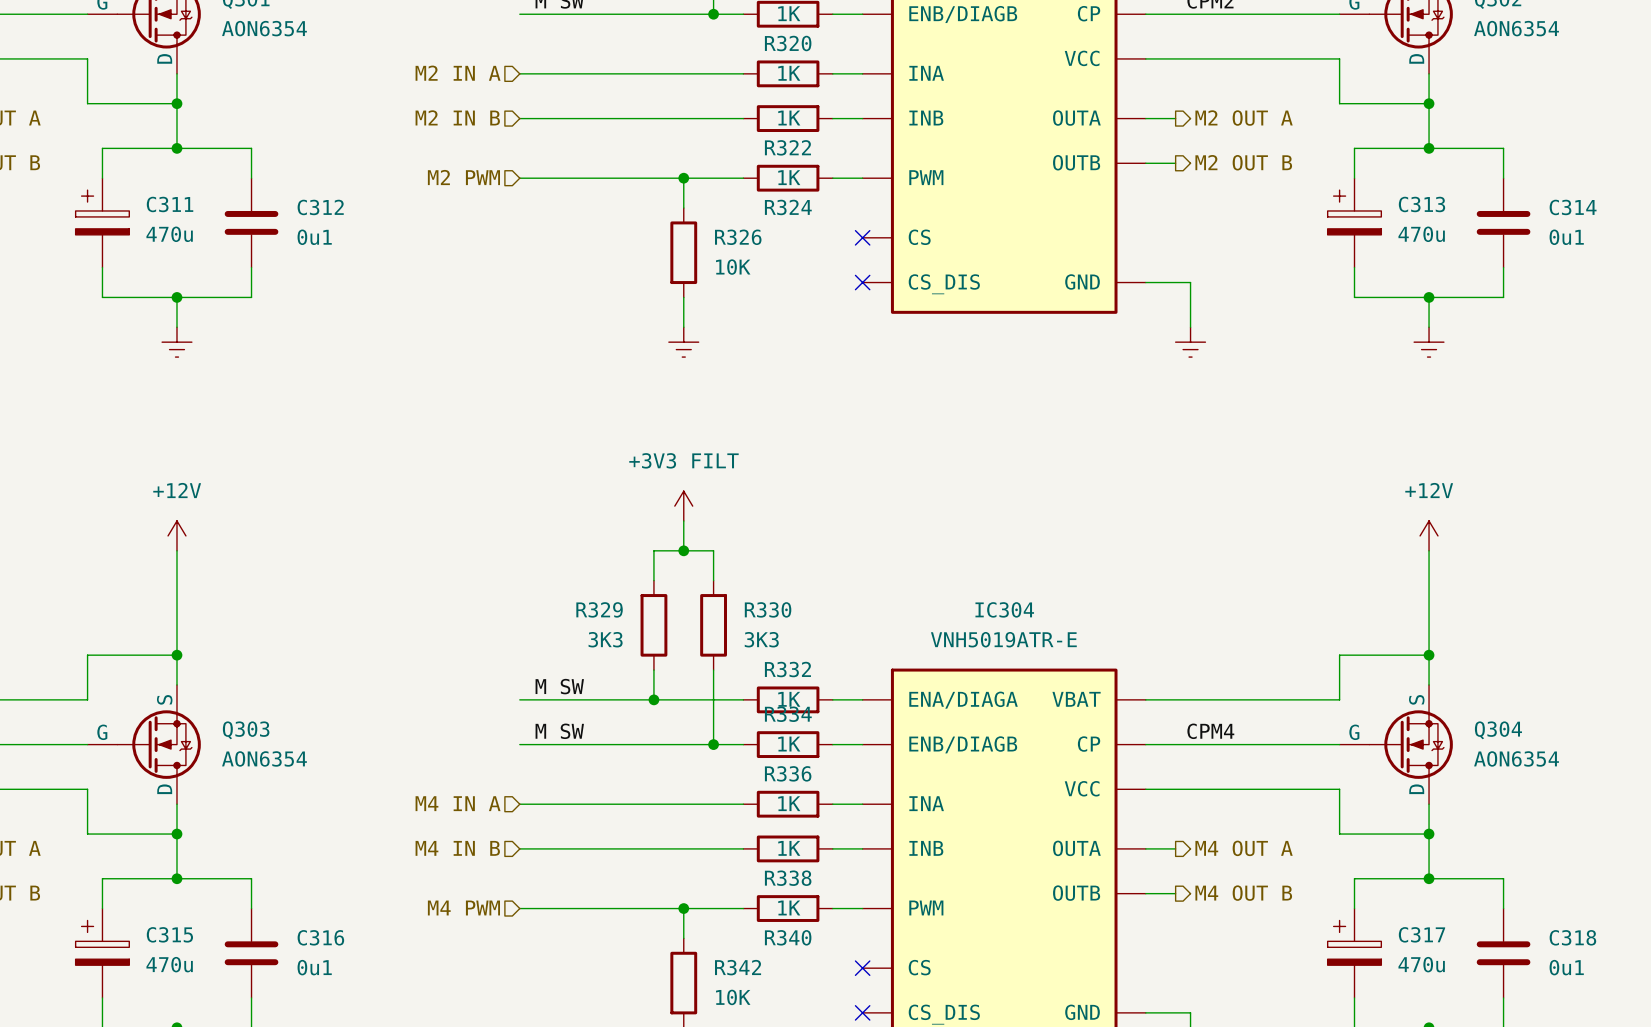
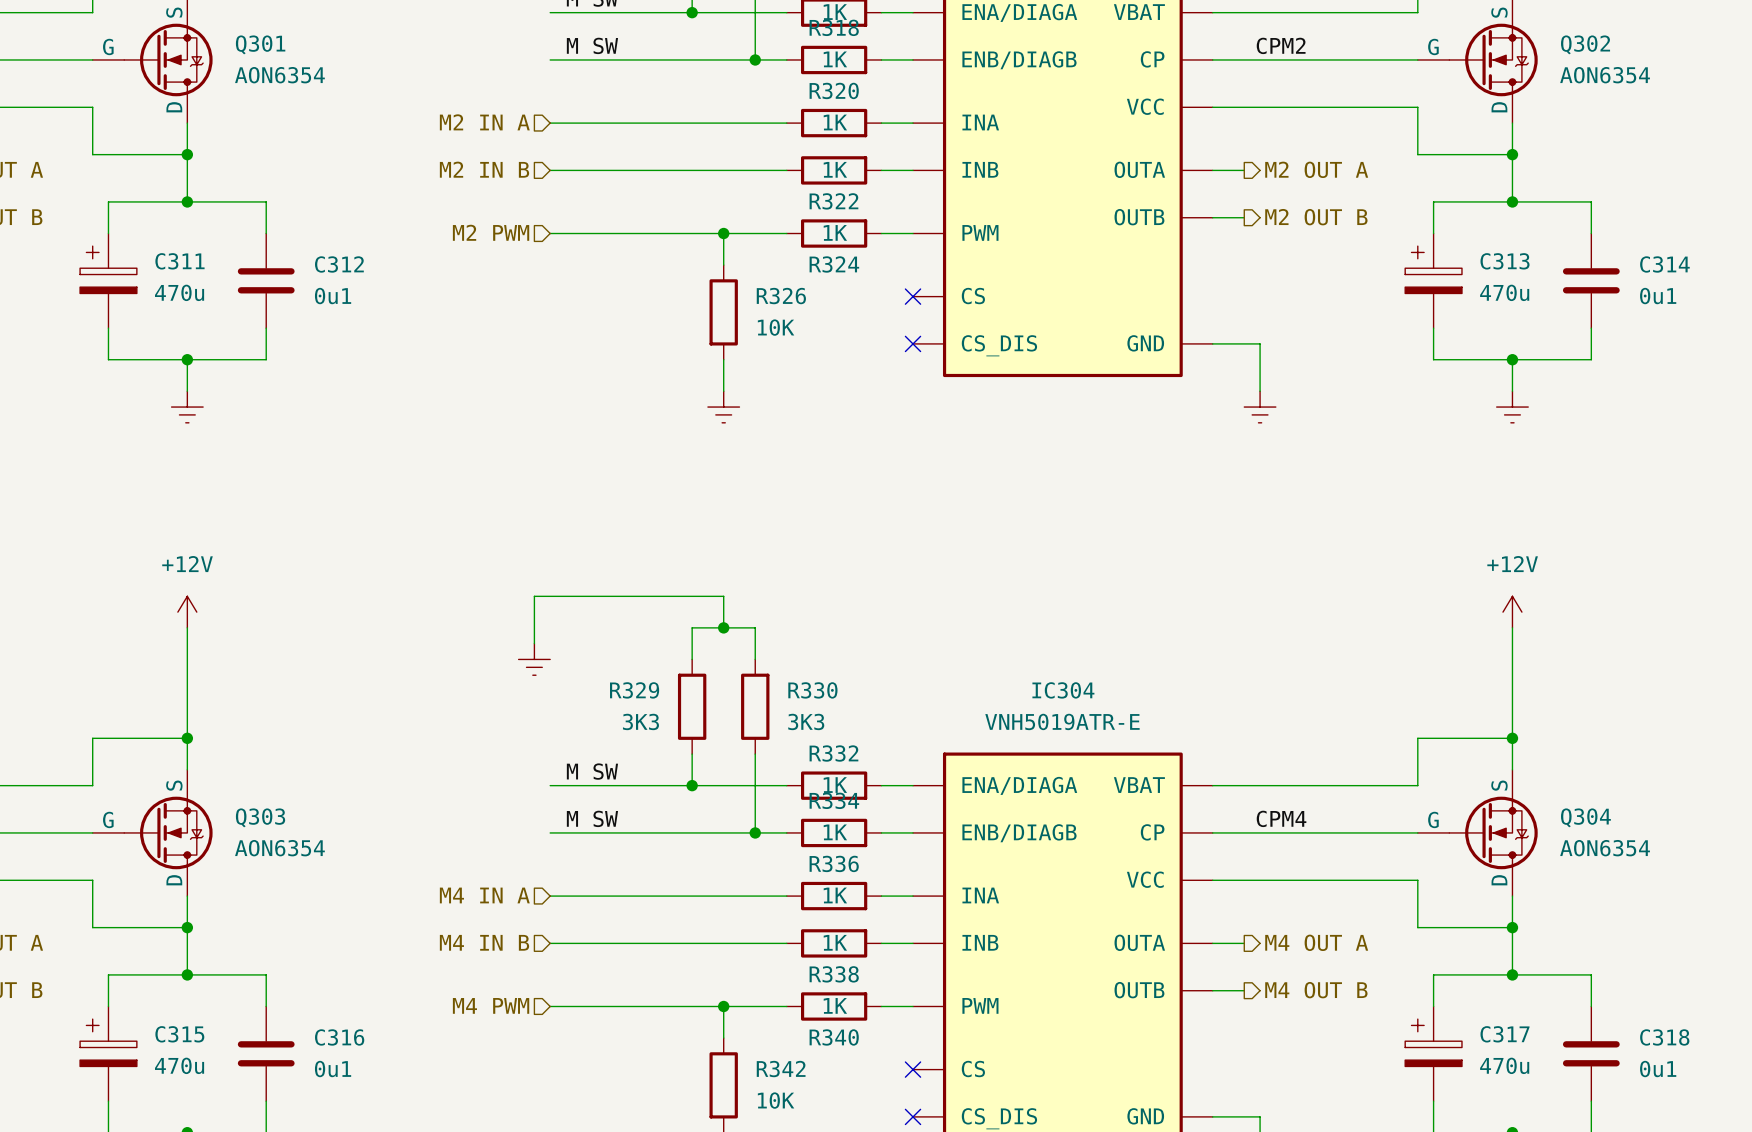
power symbol: +3V3 FILT (683, 506) -> none
wire: none -> (723, 596) (534, 596) (534, 643)
power symbol: none -> (534, 659)

